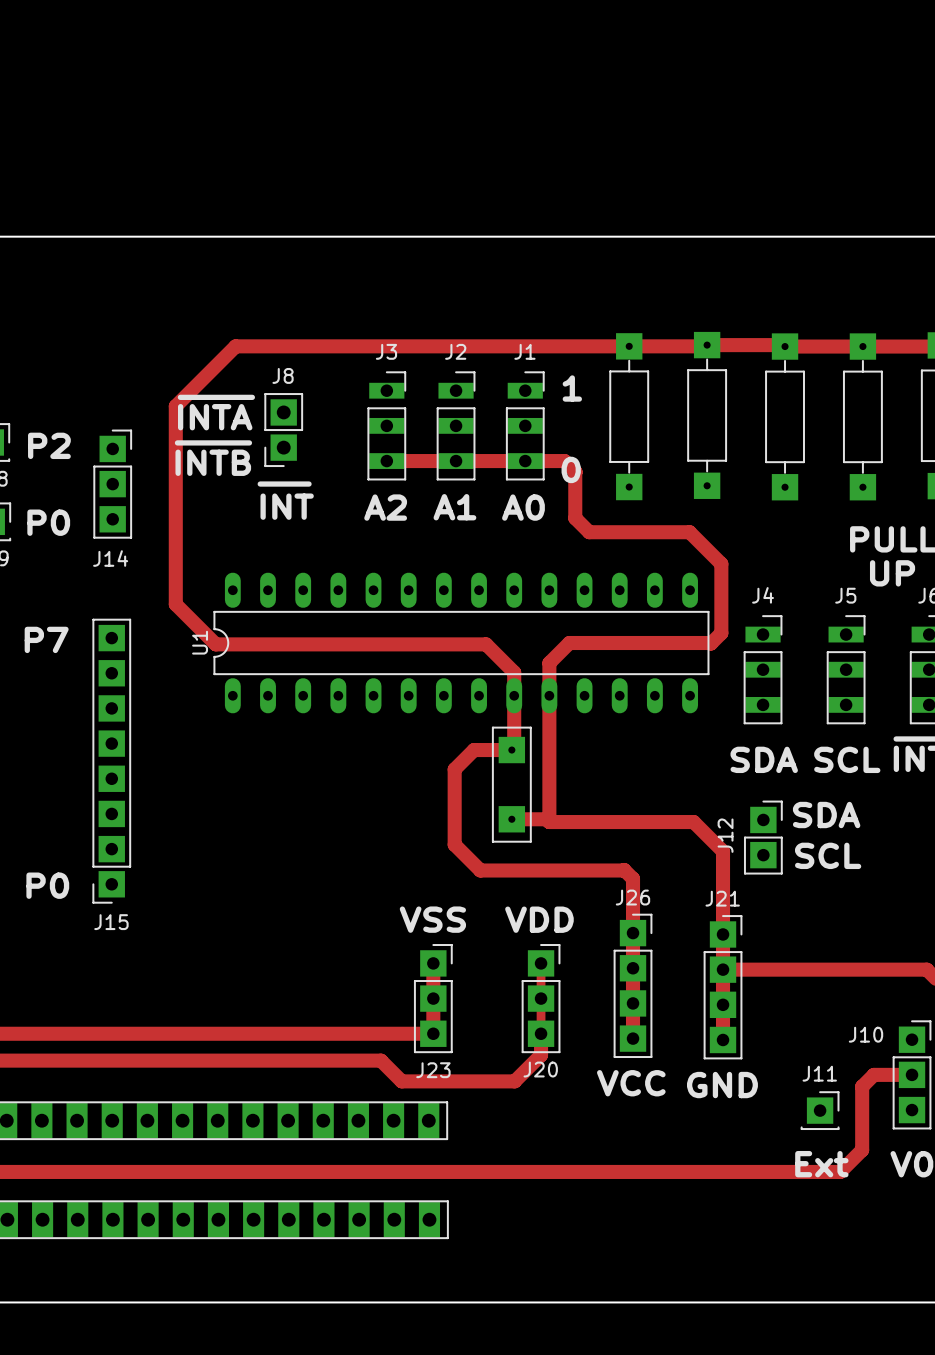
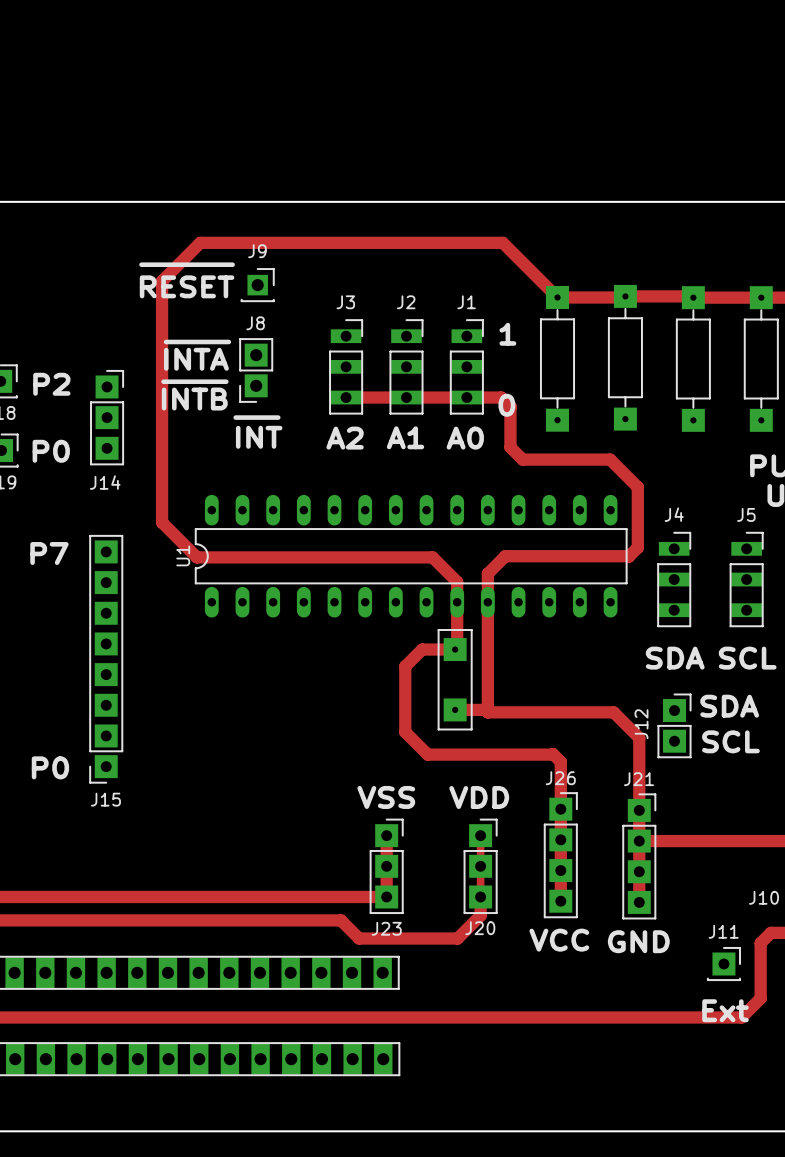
line: none -> (141, 264) (232, 264)
J9: none -> RESET (257, 285)
track: (629, 346) (235, 346) (175, 406) -> (557, 297) (502, 242) (200, 242) (162, 281) (162, 349)

